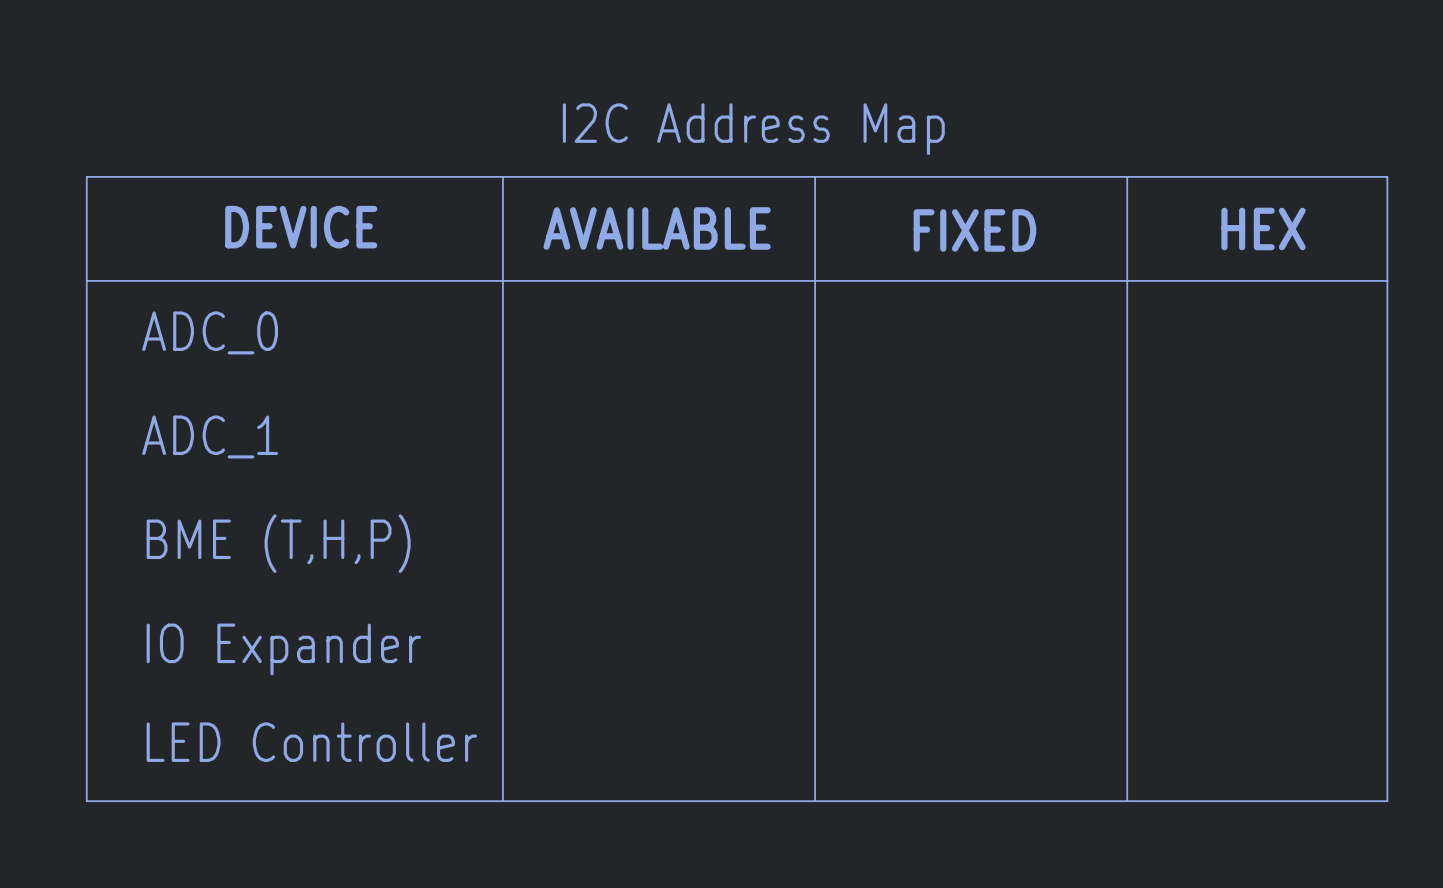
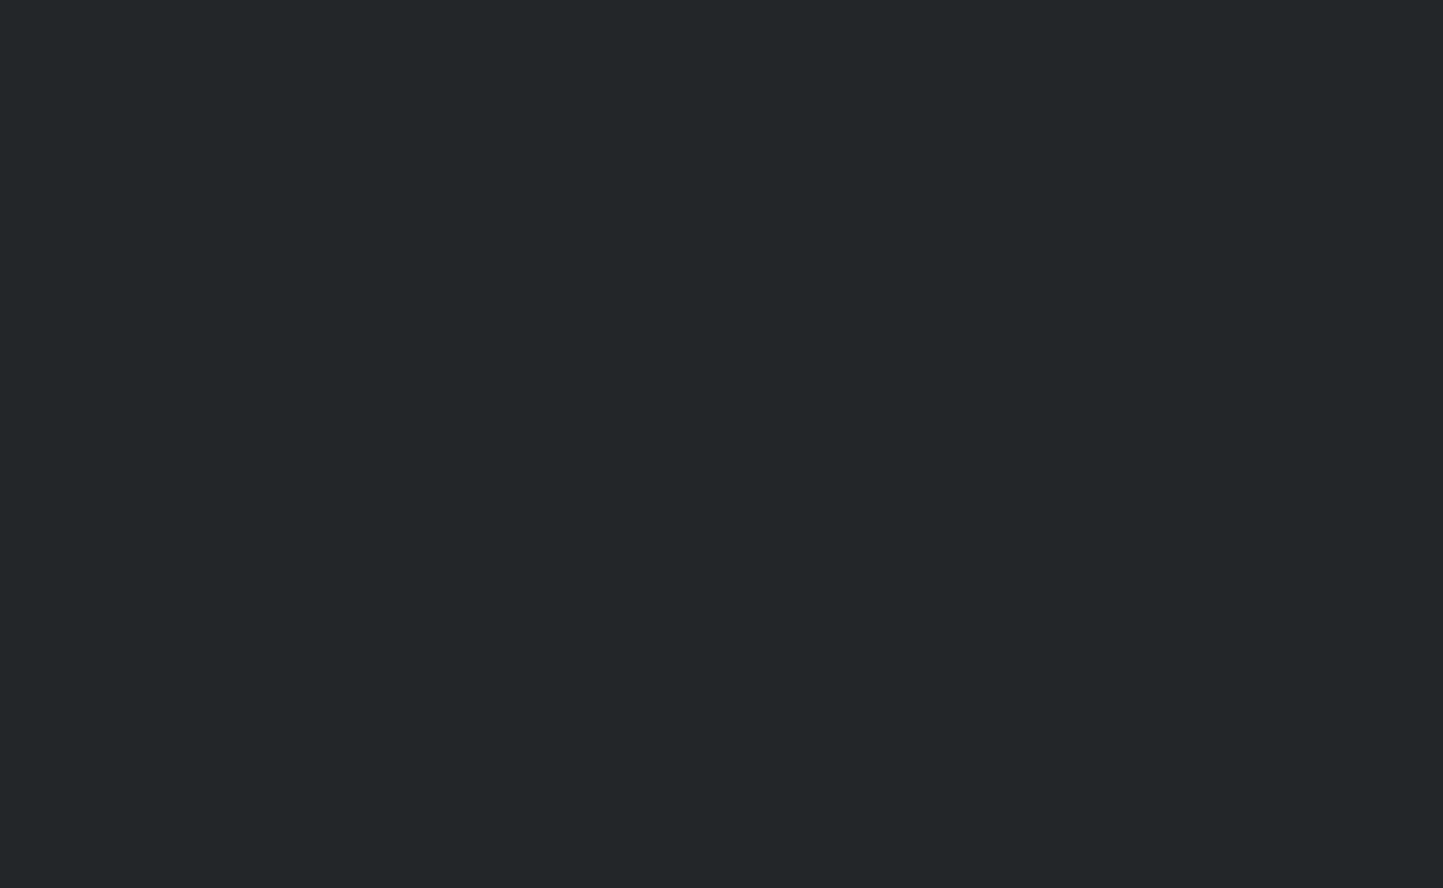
text: I2C Address Map (753, 129) -> none
line: (86, 176) (1387, 176) (1387, 801) (86, 801) (86, 176) -> none
line: (502, 176) (502, 801) -> none
line: (815, 176) (815, 801) -> none
line: (1127, 176) (1127, 801) -> none
text: DEVICE (301, 227) -> none
text: AVAILABLE (657, 228) -> none
text: HEX (1263, 228) -> none
text: FIXED (974, 230) -> none
line: (86, 280) (1387, 280) -> none
text: ADC_0 (210, 332) -> none
text: ADC_1 (210, 436) -> none
text: BME (T,H,P) (278, 543) -> none
text: IO Expander (283, 649) -> none
text: LED Controller (311, 742) -> none

